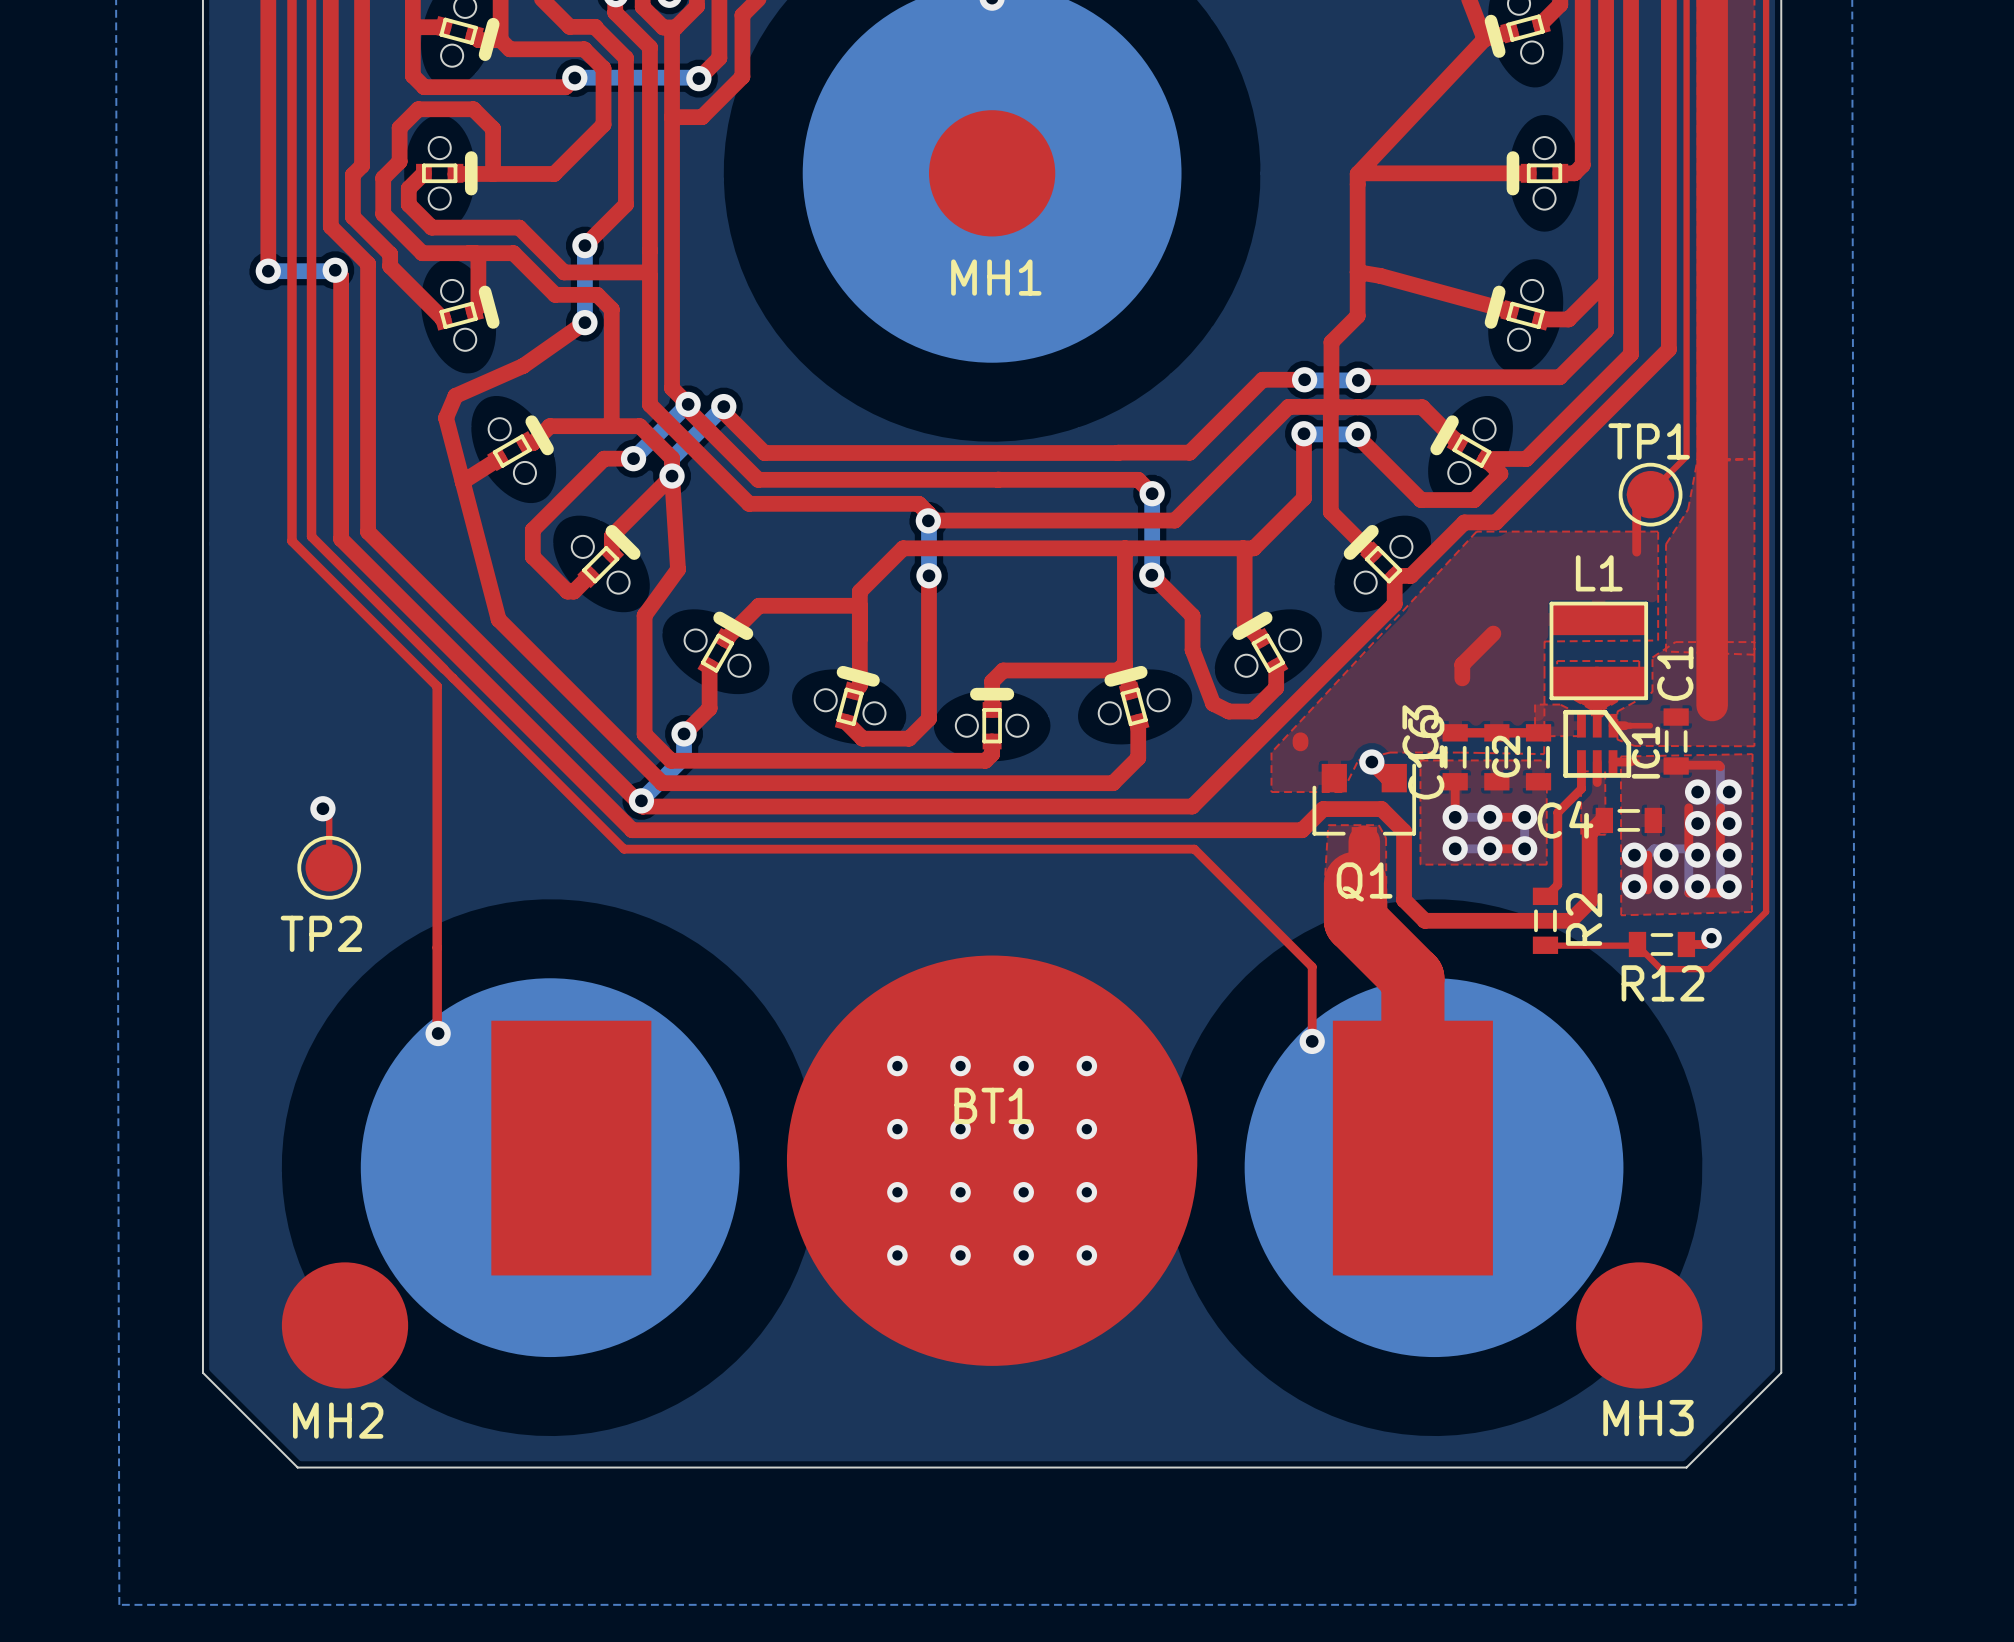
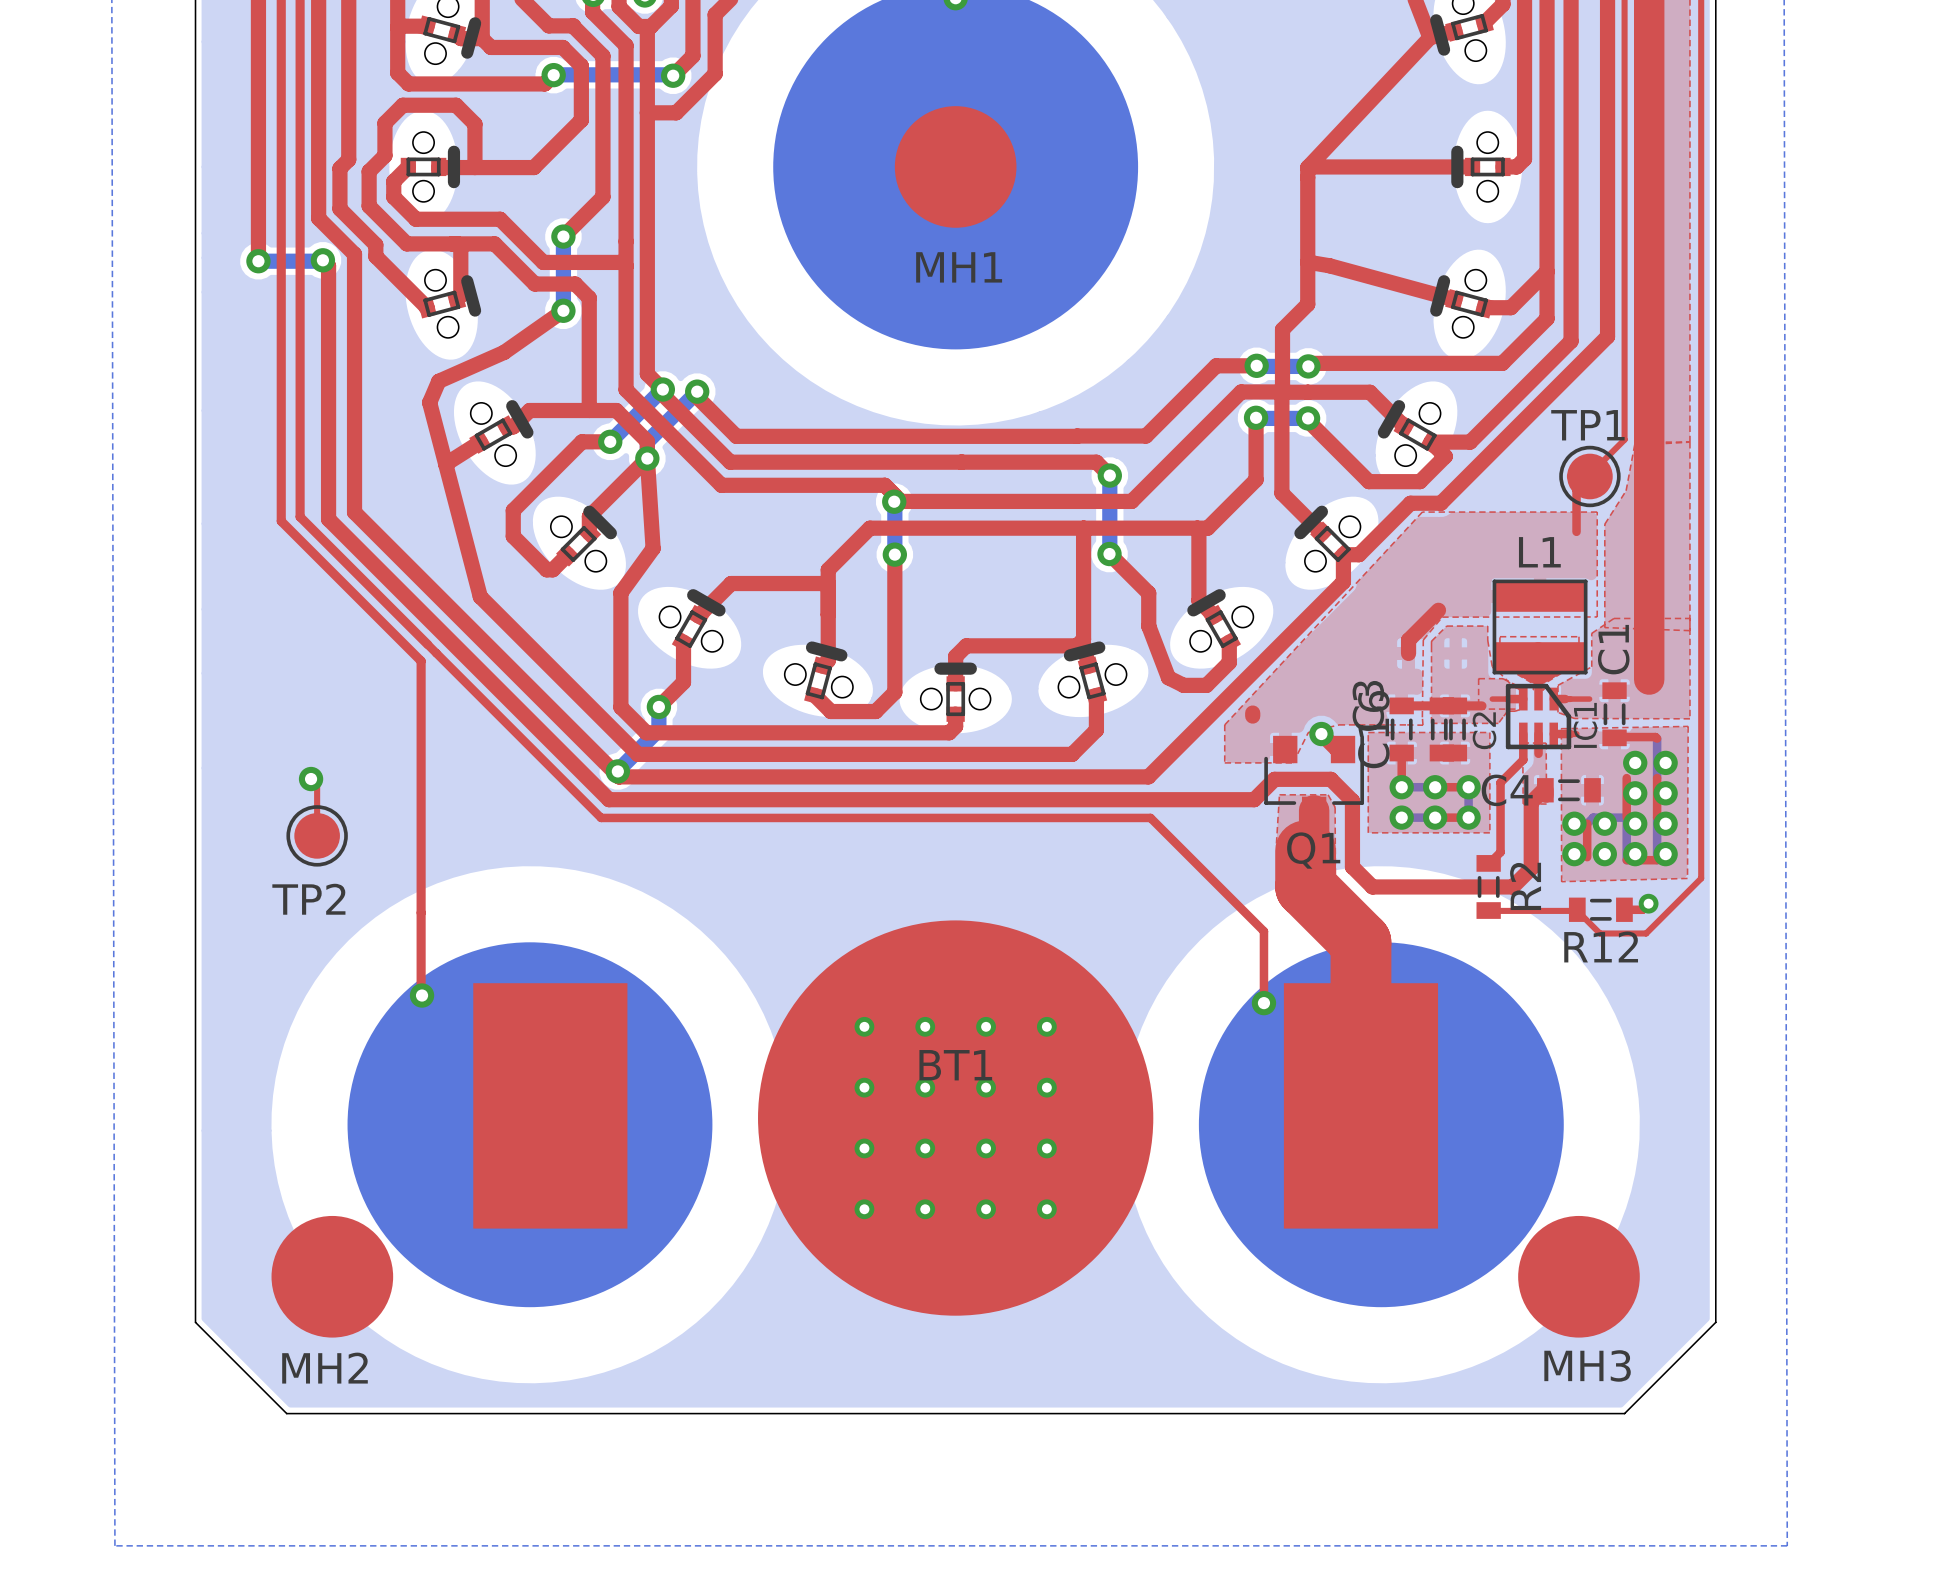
top zone outline: (1658, 640) (1544, 641) (1544, 649) -> (1487, 640) (1492, 667) (1519, 689) (1519, 709) (1507, 711) (1498, 723) (1431, 723) (1431, 641) (1446, 626) (1487, 626)
top zone outline: (1544, 664) (1544, 754) (1477, 752) -> (1597, 616) (1442, 617) (1423, 640) (1422, 725)
top track: none -> (1492, 699) (1523, 699)
C2 name position: C2 (1506, 756) -> C2 (1484, 730)
C2 position: (1538, 757) -> (1454, 729)

